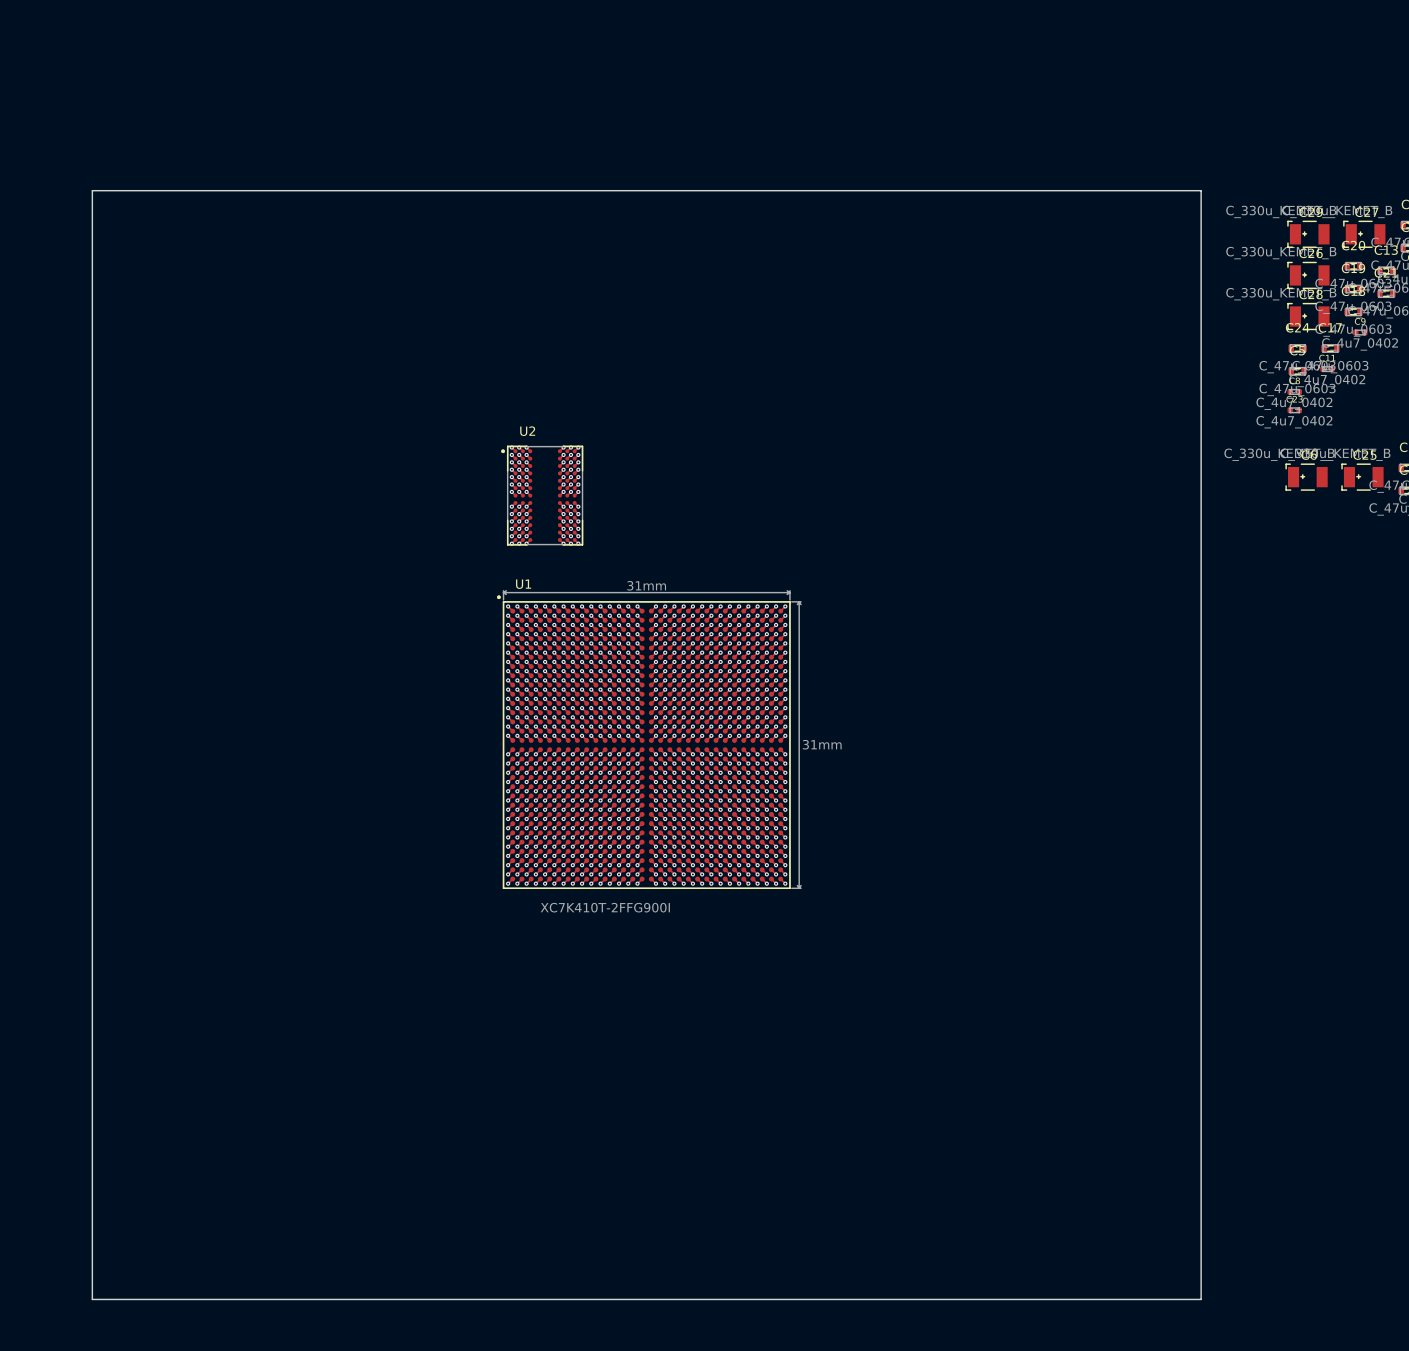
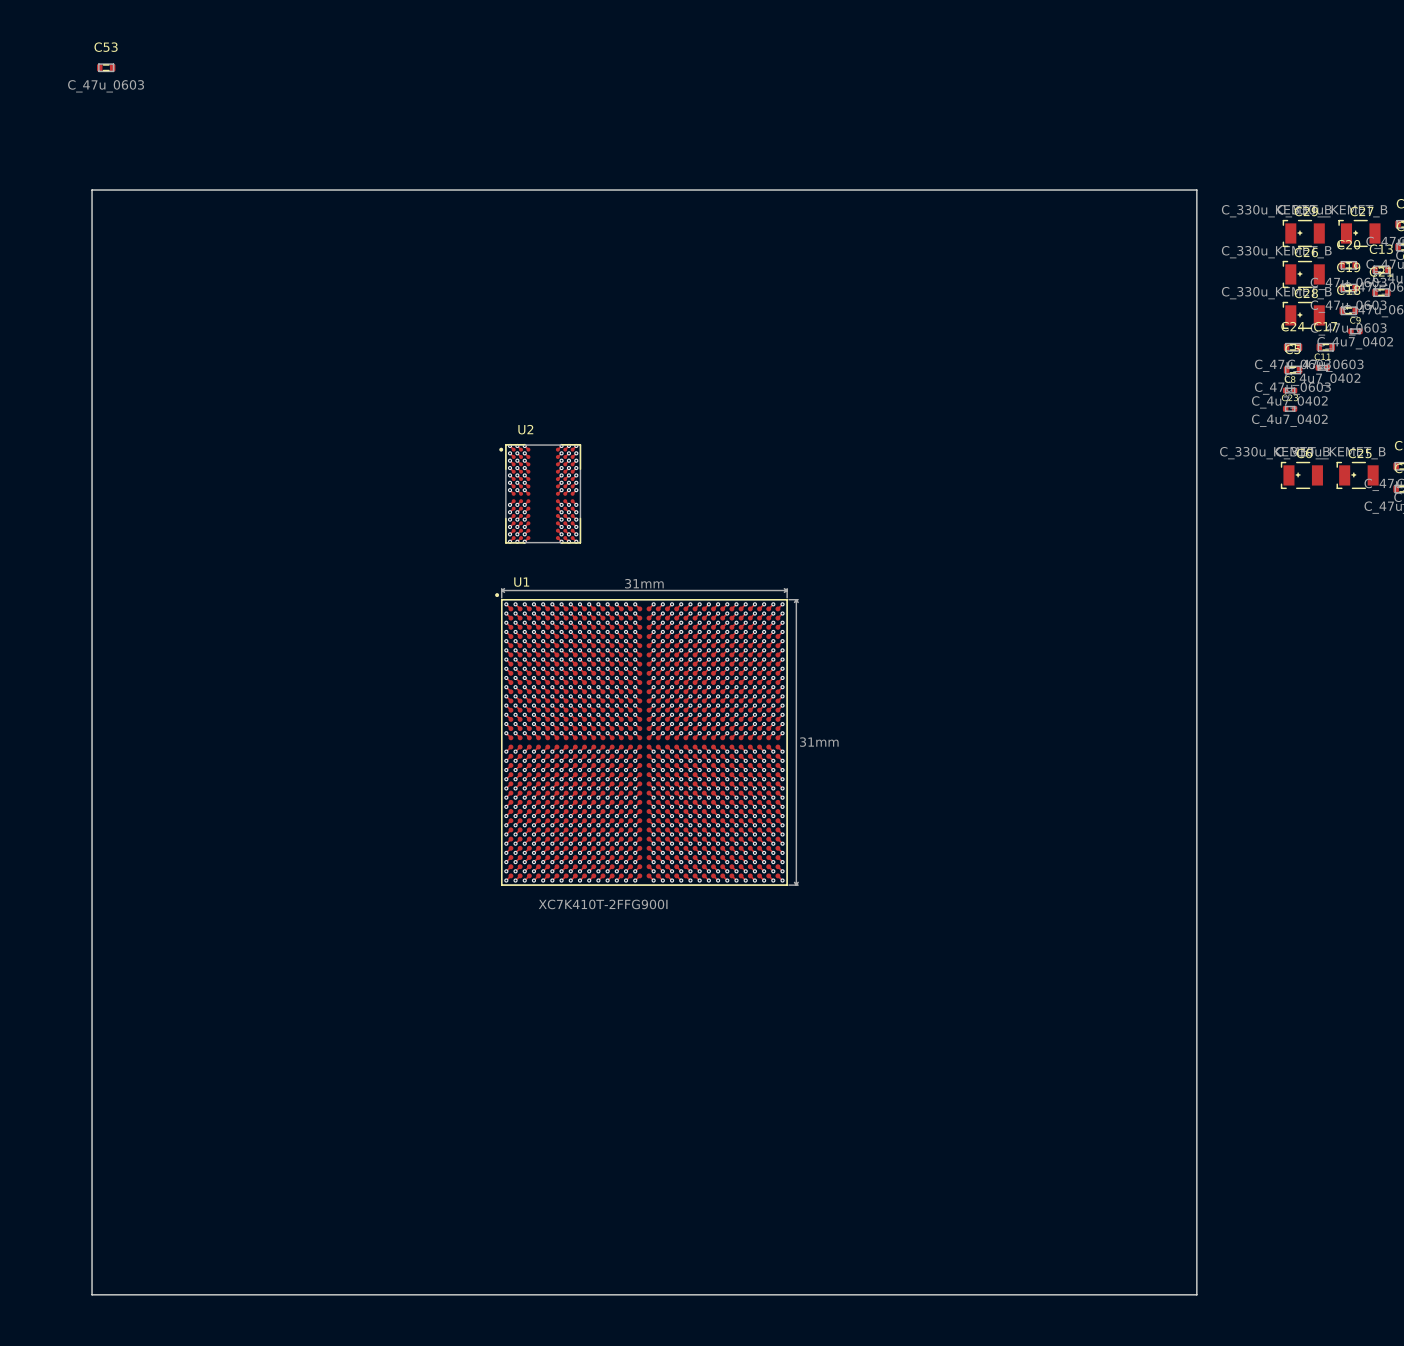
C53: none -> C_47u_0603 (106, 67)

